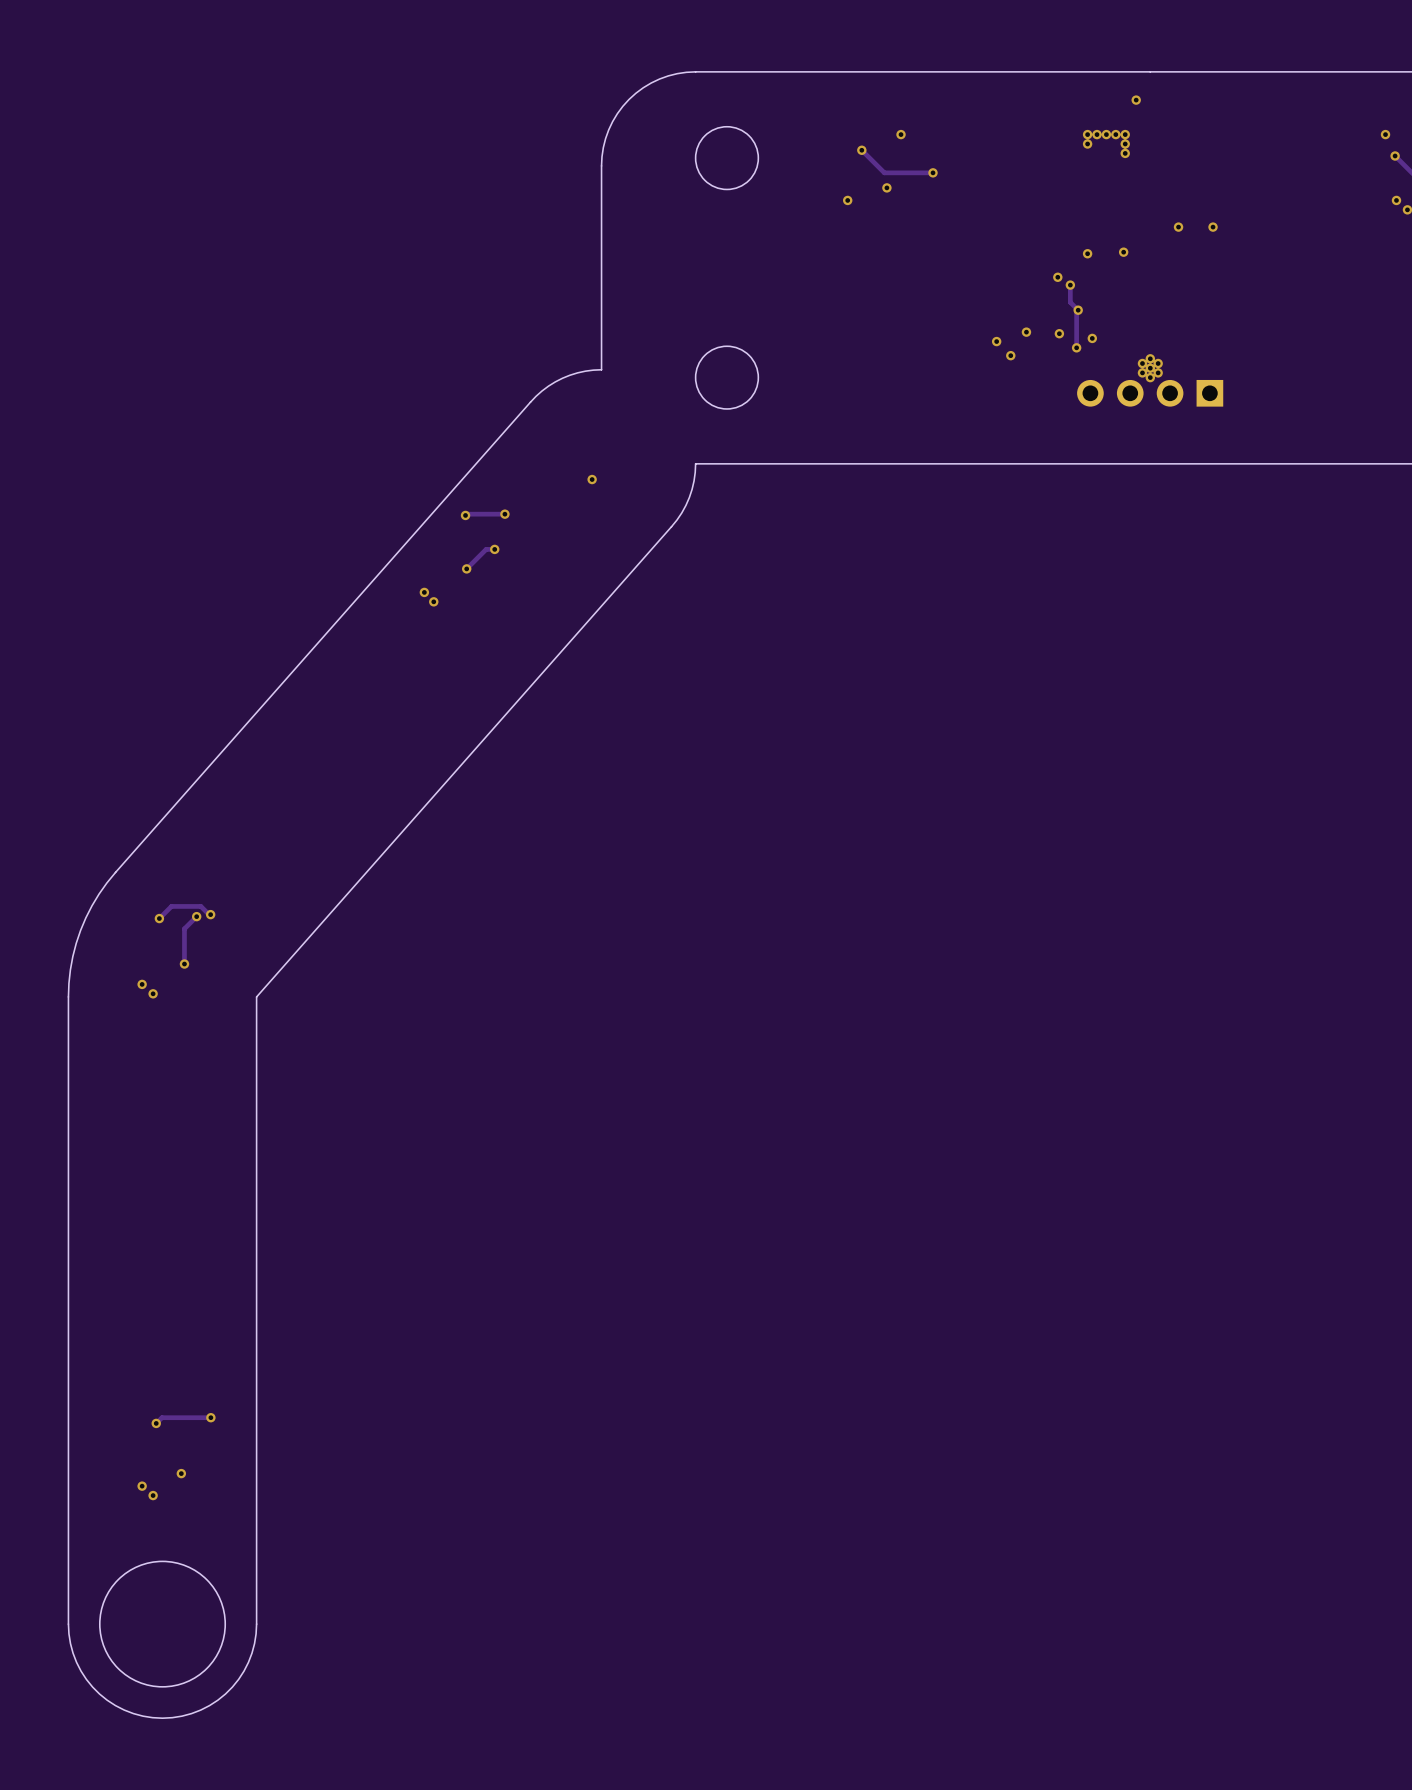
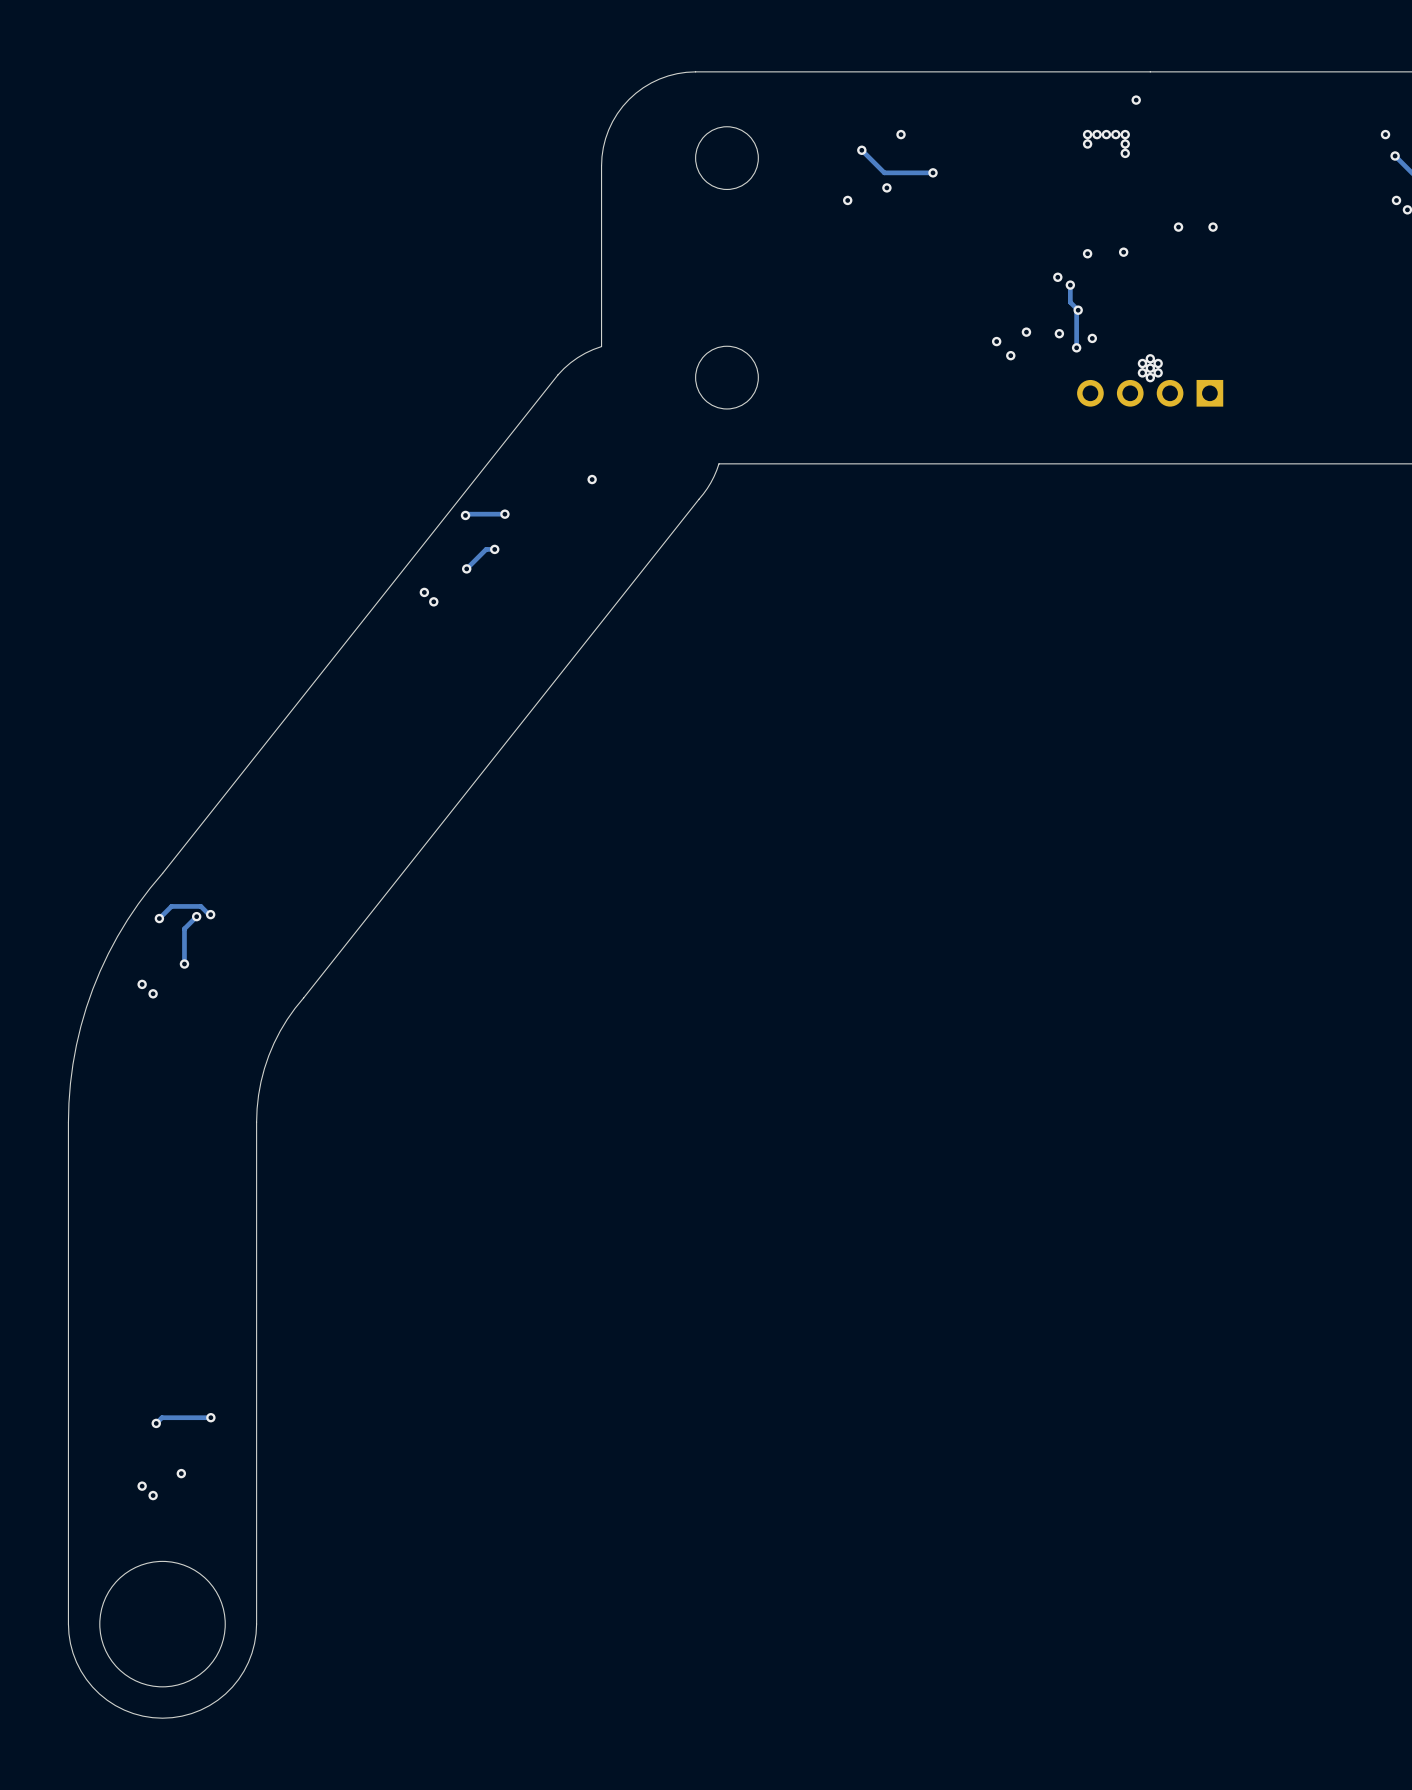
board edge: (601, 346) (601, 369) (577, 372) (562, 378) (536, 396) (115, 872) (99, 894) (80, 930) (70, 969) (68, 996) (68, 1122) -> (601, 346) (577, 357) (558, 374) (138, 903) (108, 953) (86, 1007) (72, 1064) (68, 1122)
board edge: (718, 463) (695, 463) (694, 480) (689, 497) (681, 512) (671, 526) (256, 996) (256, 1122) -> (718, 463) (703, 494) (287, 1019) (274, 1043) (264, 1068) (258, 1095) (256, 1122)

